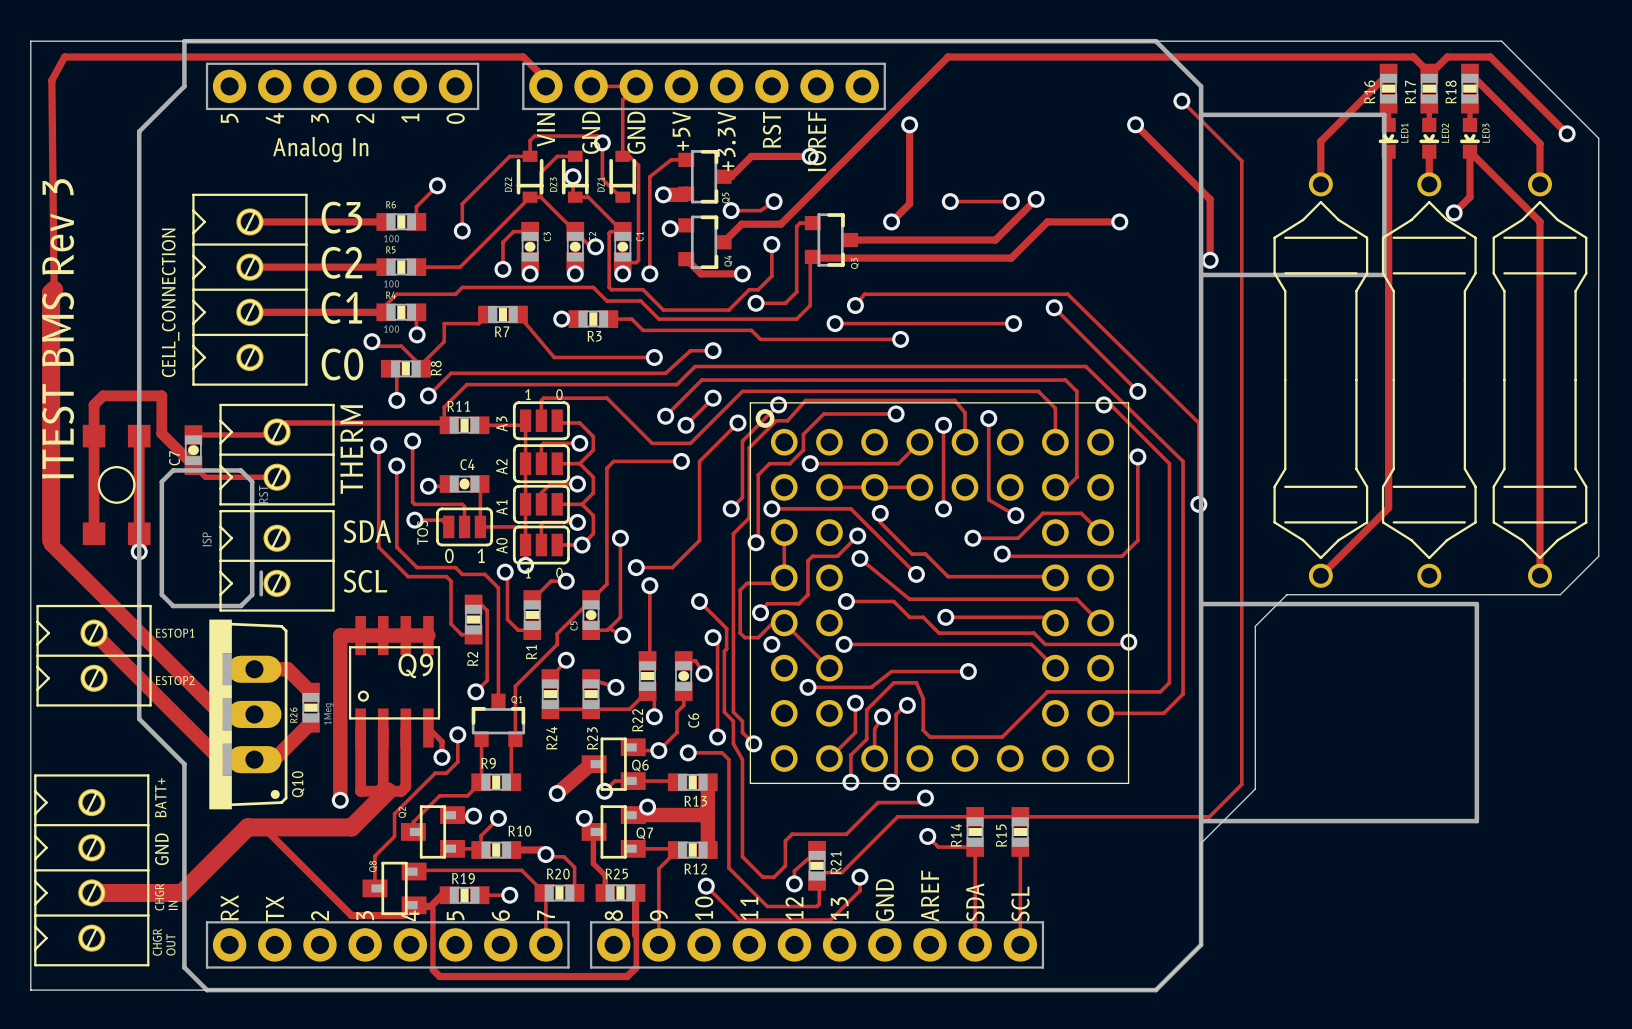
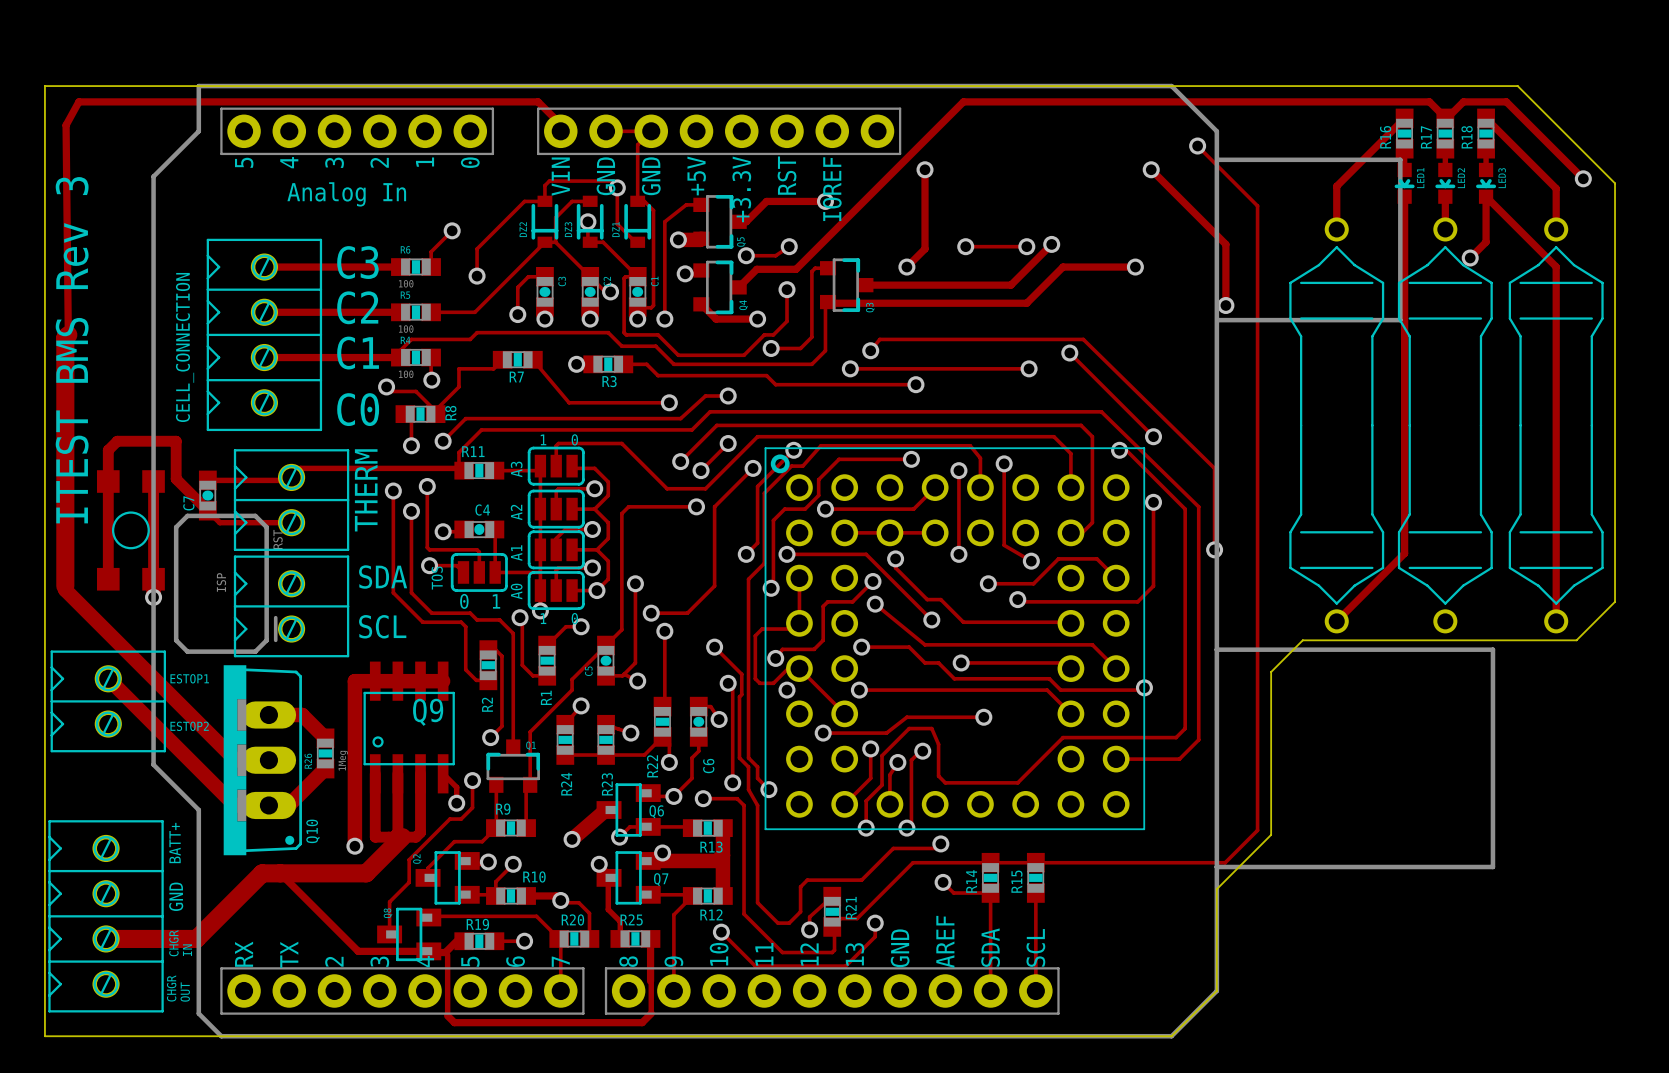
track: (247, 827) (263, 827) (351, 915) (403, 915) (414, 905) -> (280, 873) (358, 951) (428, 951)

